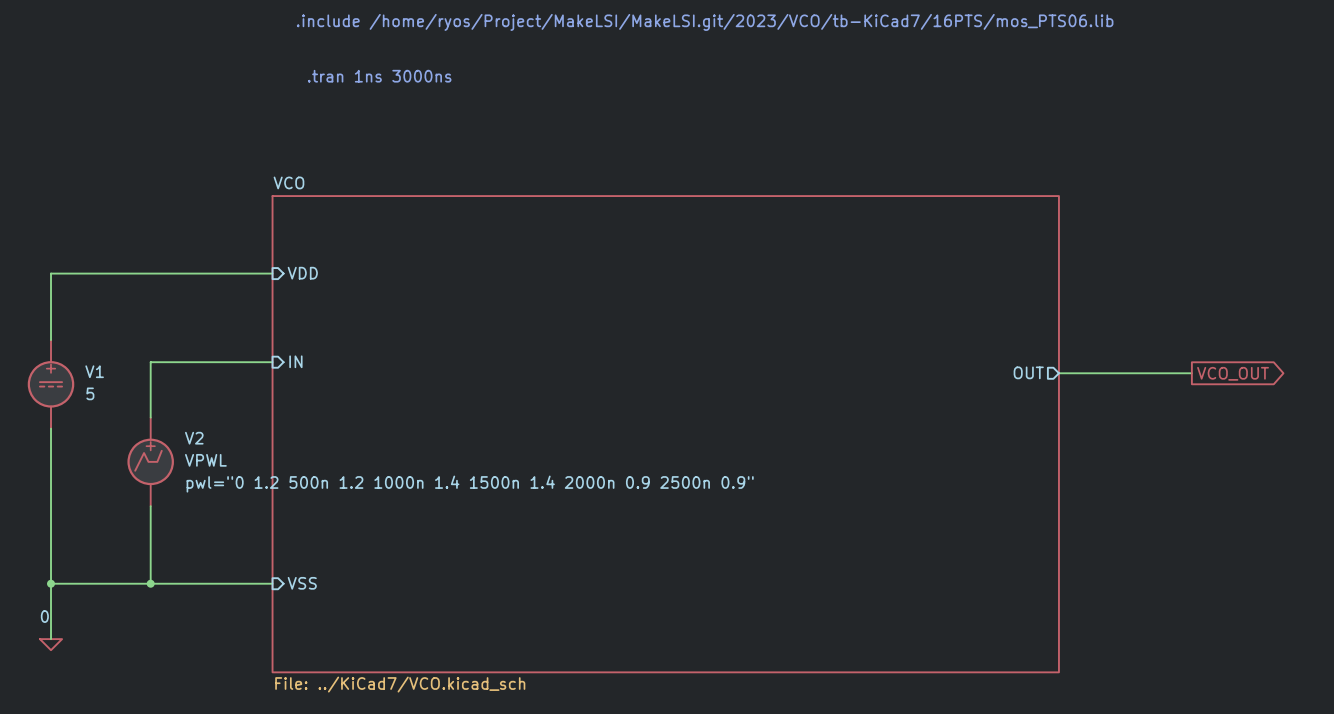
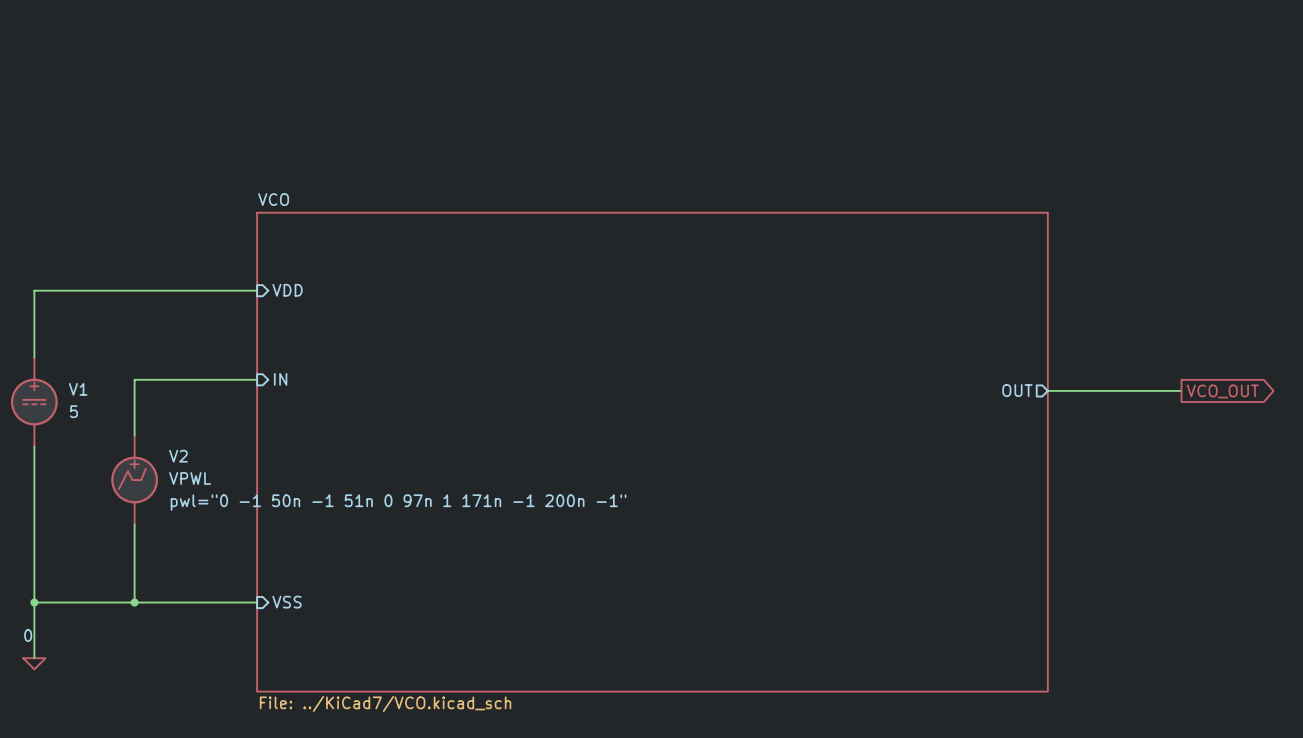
text: .include /home/ryos/Project/MakeLSI/MakeLSI.git/2023/VCO/tb-KiCad7/16PTS/mos_PTS06.lib (705, 22) -> none
text: .tran 1ns 3000ns (379, 76) -> none
V2 text: pwl="0 1.2 500n 1.2 1000n 1.4 1500n 1.4 2000n 0.9 2500n 0.9" (470, 484) -> pwl="0 -1 50n -1 51n 0 97n 1 171n -1 200n -1" (398, 502)

